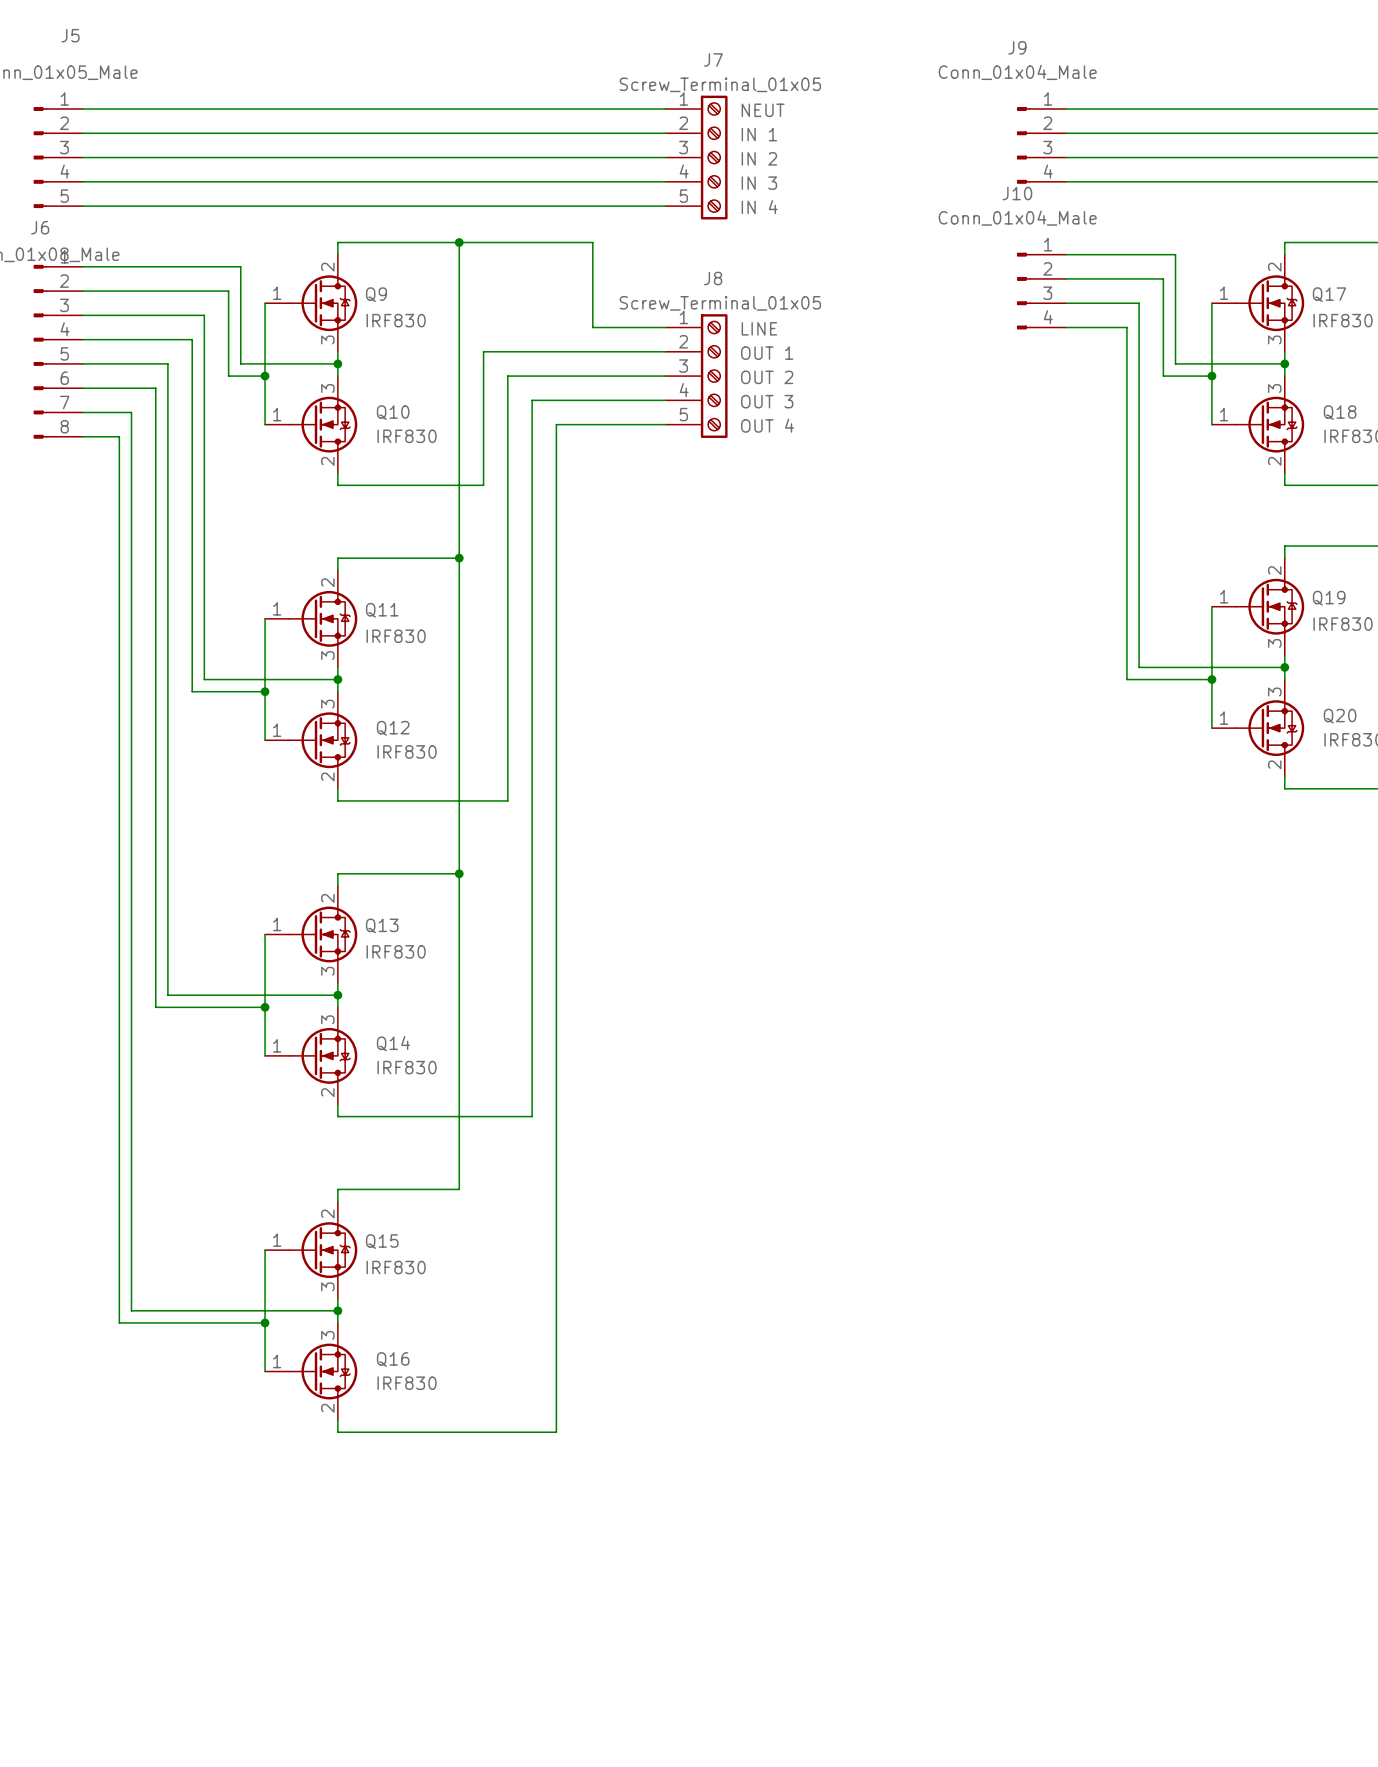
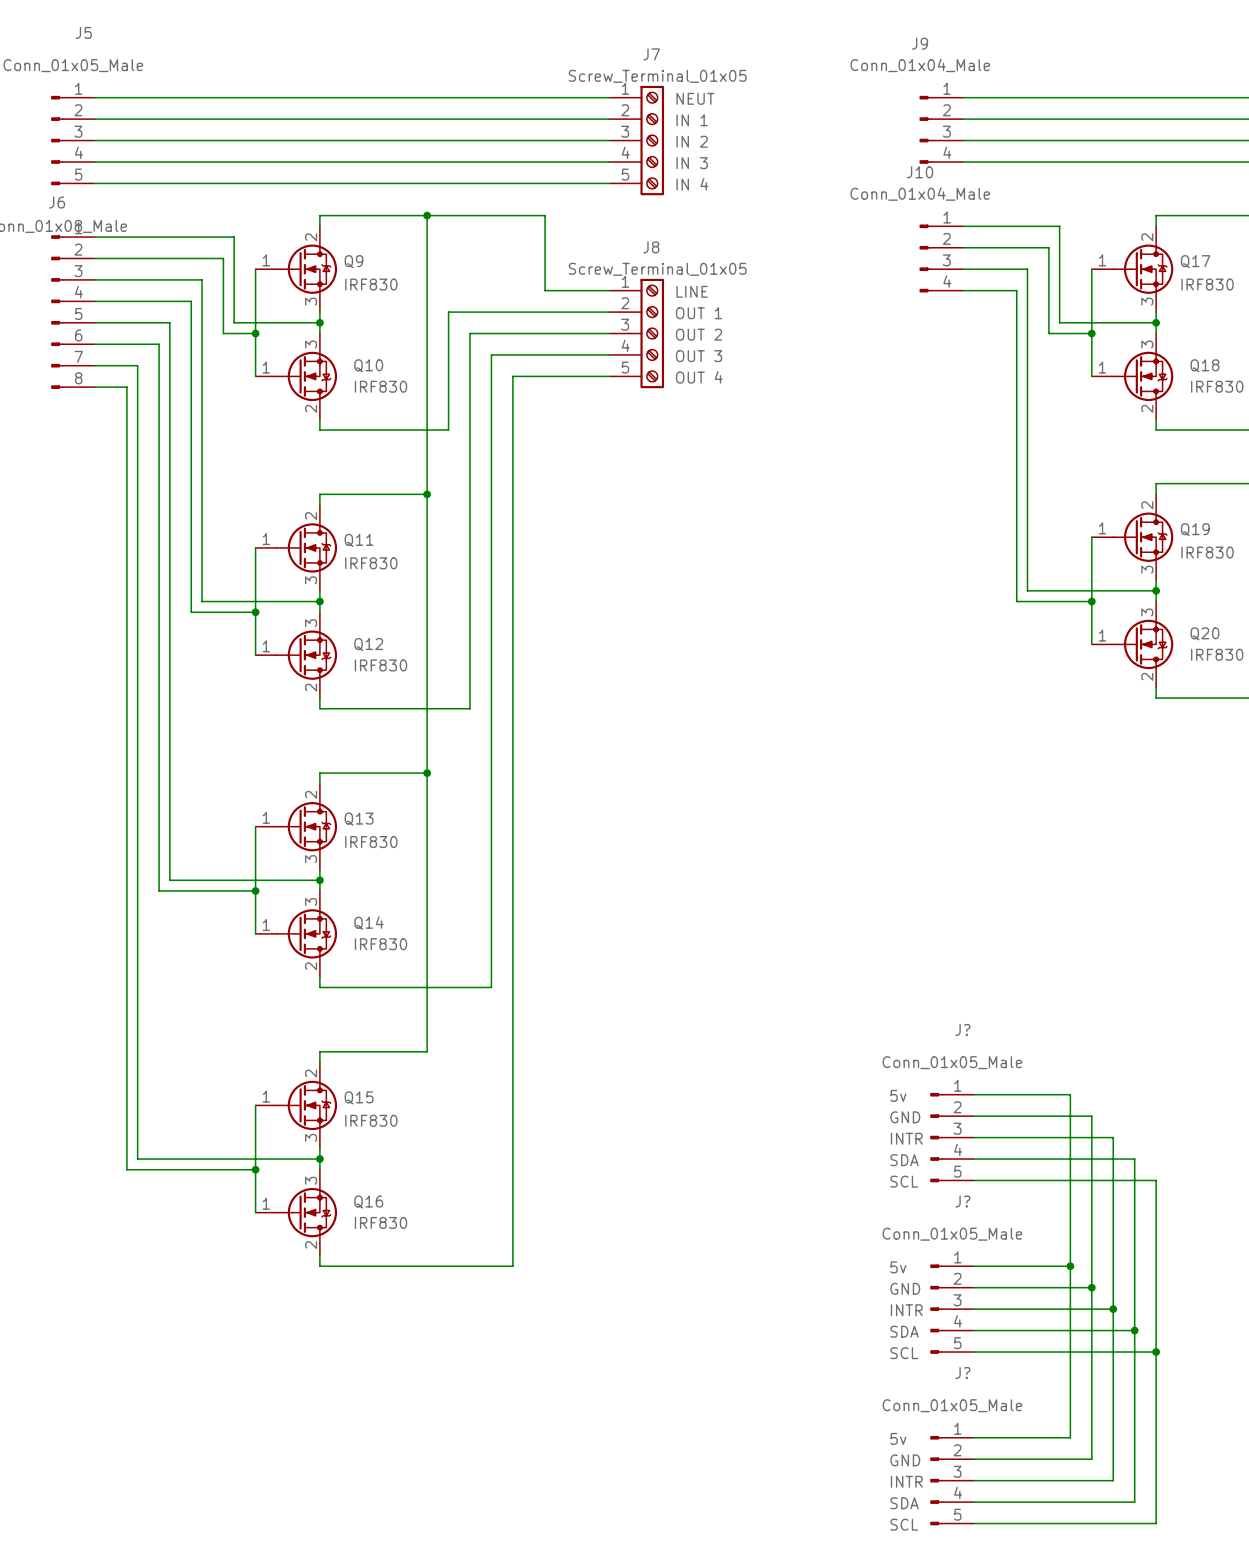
wire: none -> (973, 1094) (1070, 1094) (1070, 1437) (973, 1437)
label: none -> 5v (898, 1095)
wire: none -> (973, 1116) (1091, 1116) (1091, 1459) (973, 1459)
label: none -> GND (905, 1117)
J?: none -> Conn_01x05_Male (952, 1137)
wire: none -> (973, 1137) (1113, 1137) (1113, 1480) (973, 1480)
label: none -> INTR (906, 1138)
wire: none -> (973, 1159) (1134, 1159) (1134, 1502) (973, 1502)
label: none -> SDA (904, 1160)
wire: none -> (973, 1180) (1156, 1180) (1156, 1523) (973, 1523)
label: none -> SCL (904, 1181)
wire: none -> (973, 1266) (1070, 1266)
junction: none -> (1070, 1266)
label: none -> 5v (898, 1267)
wire: none -> (973, 1287) (1091, 1287)
junction: none -> (1091, 1287)
label: none -> GND (905, 1288)
J?: none -> Conn_01x05_Male (952, 1309)
wire: none -> (973, 1309) (1113, 1309)
junction: none -> (1113, 1309)
label: none -> INTR (906, 1310)
wire: none -> (973, 1330) (1134, 1330)
junction: none -> (1134, 1330)
label: none -> SDA (904, 1331)
wire: none -> (973, 1352) (1156, 1352)
junction: none -> (1156, 1352)
label: none -> SCL (904, 1353)
label: none -> 5v (898, 1438)
label: none -> GND (905, 1460)
J?: none -> Conn_01x05_Male (952, 1480)
label: none -> INTR (906, 1481)
label: none -> SDA (904, 1503)
label: none -> SCL (904, 1524)

